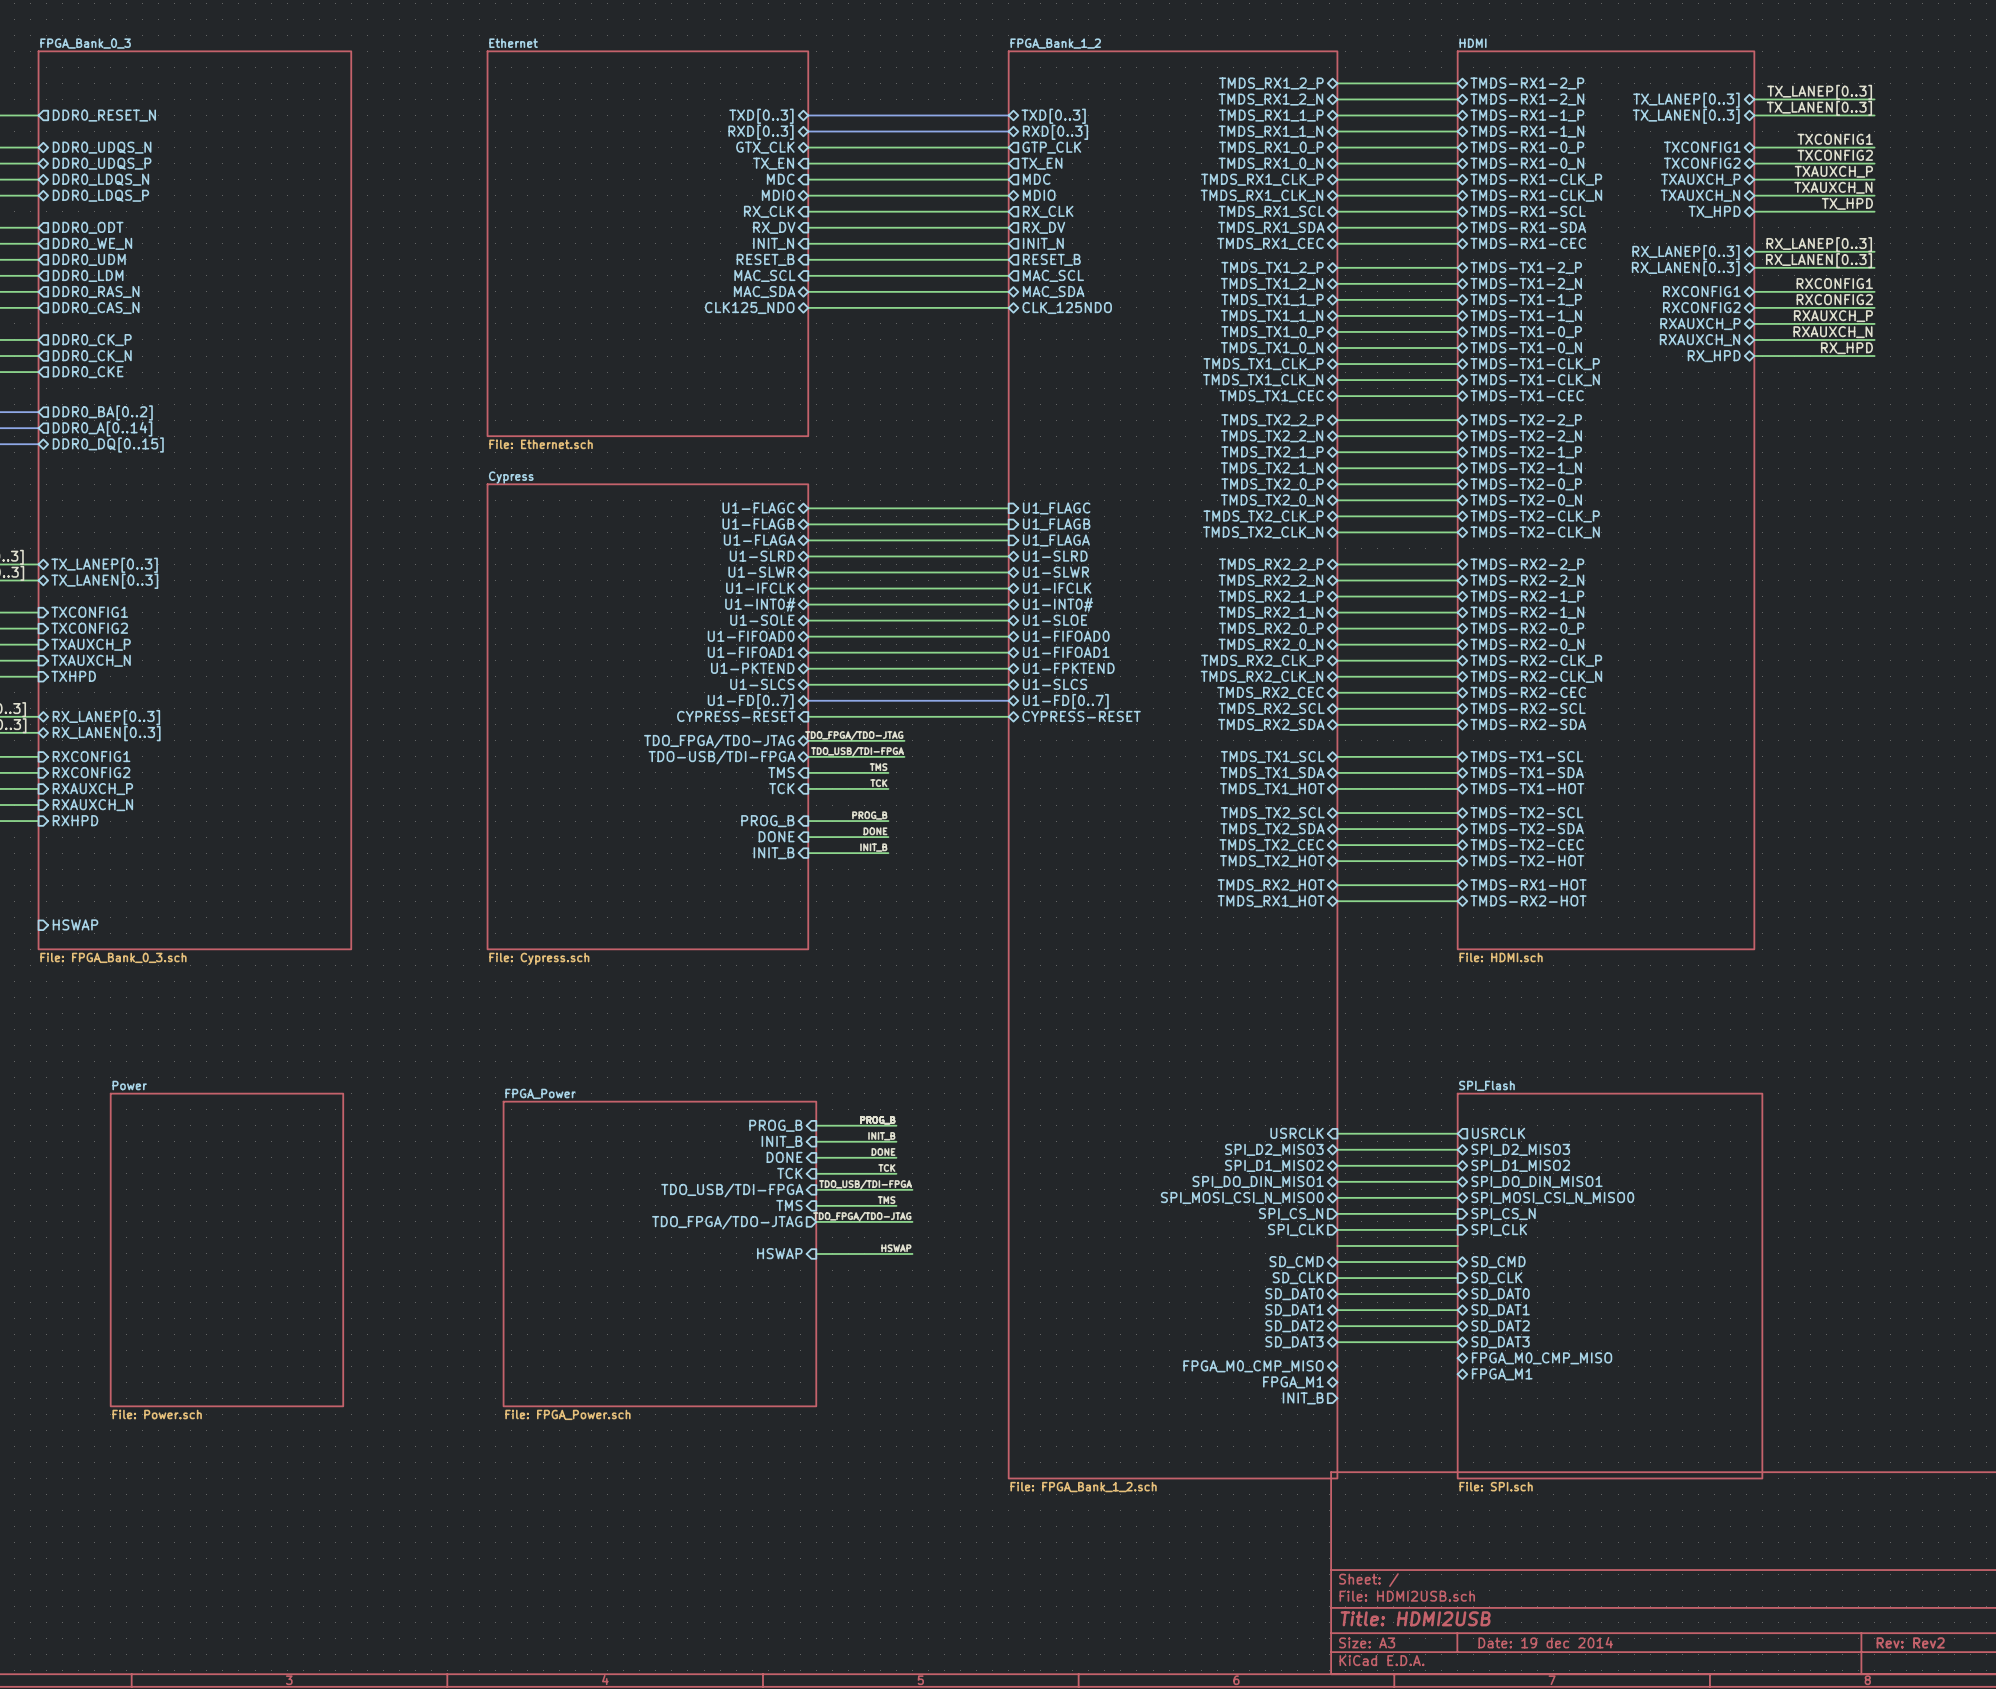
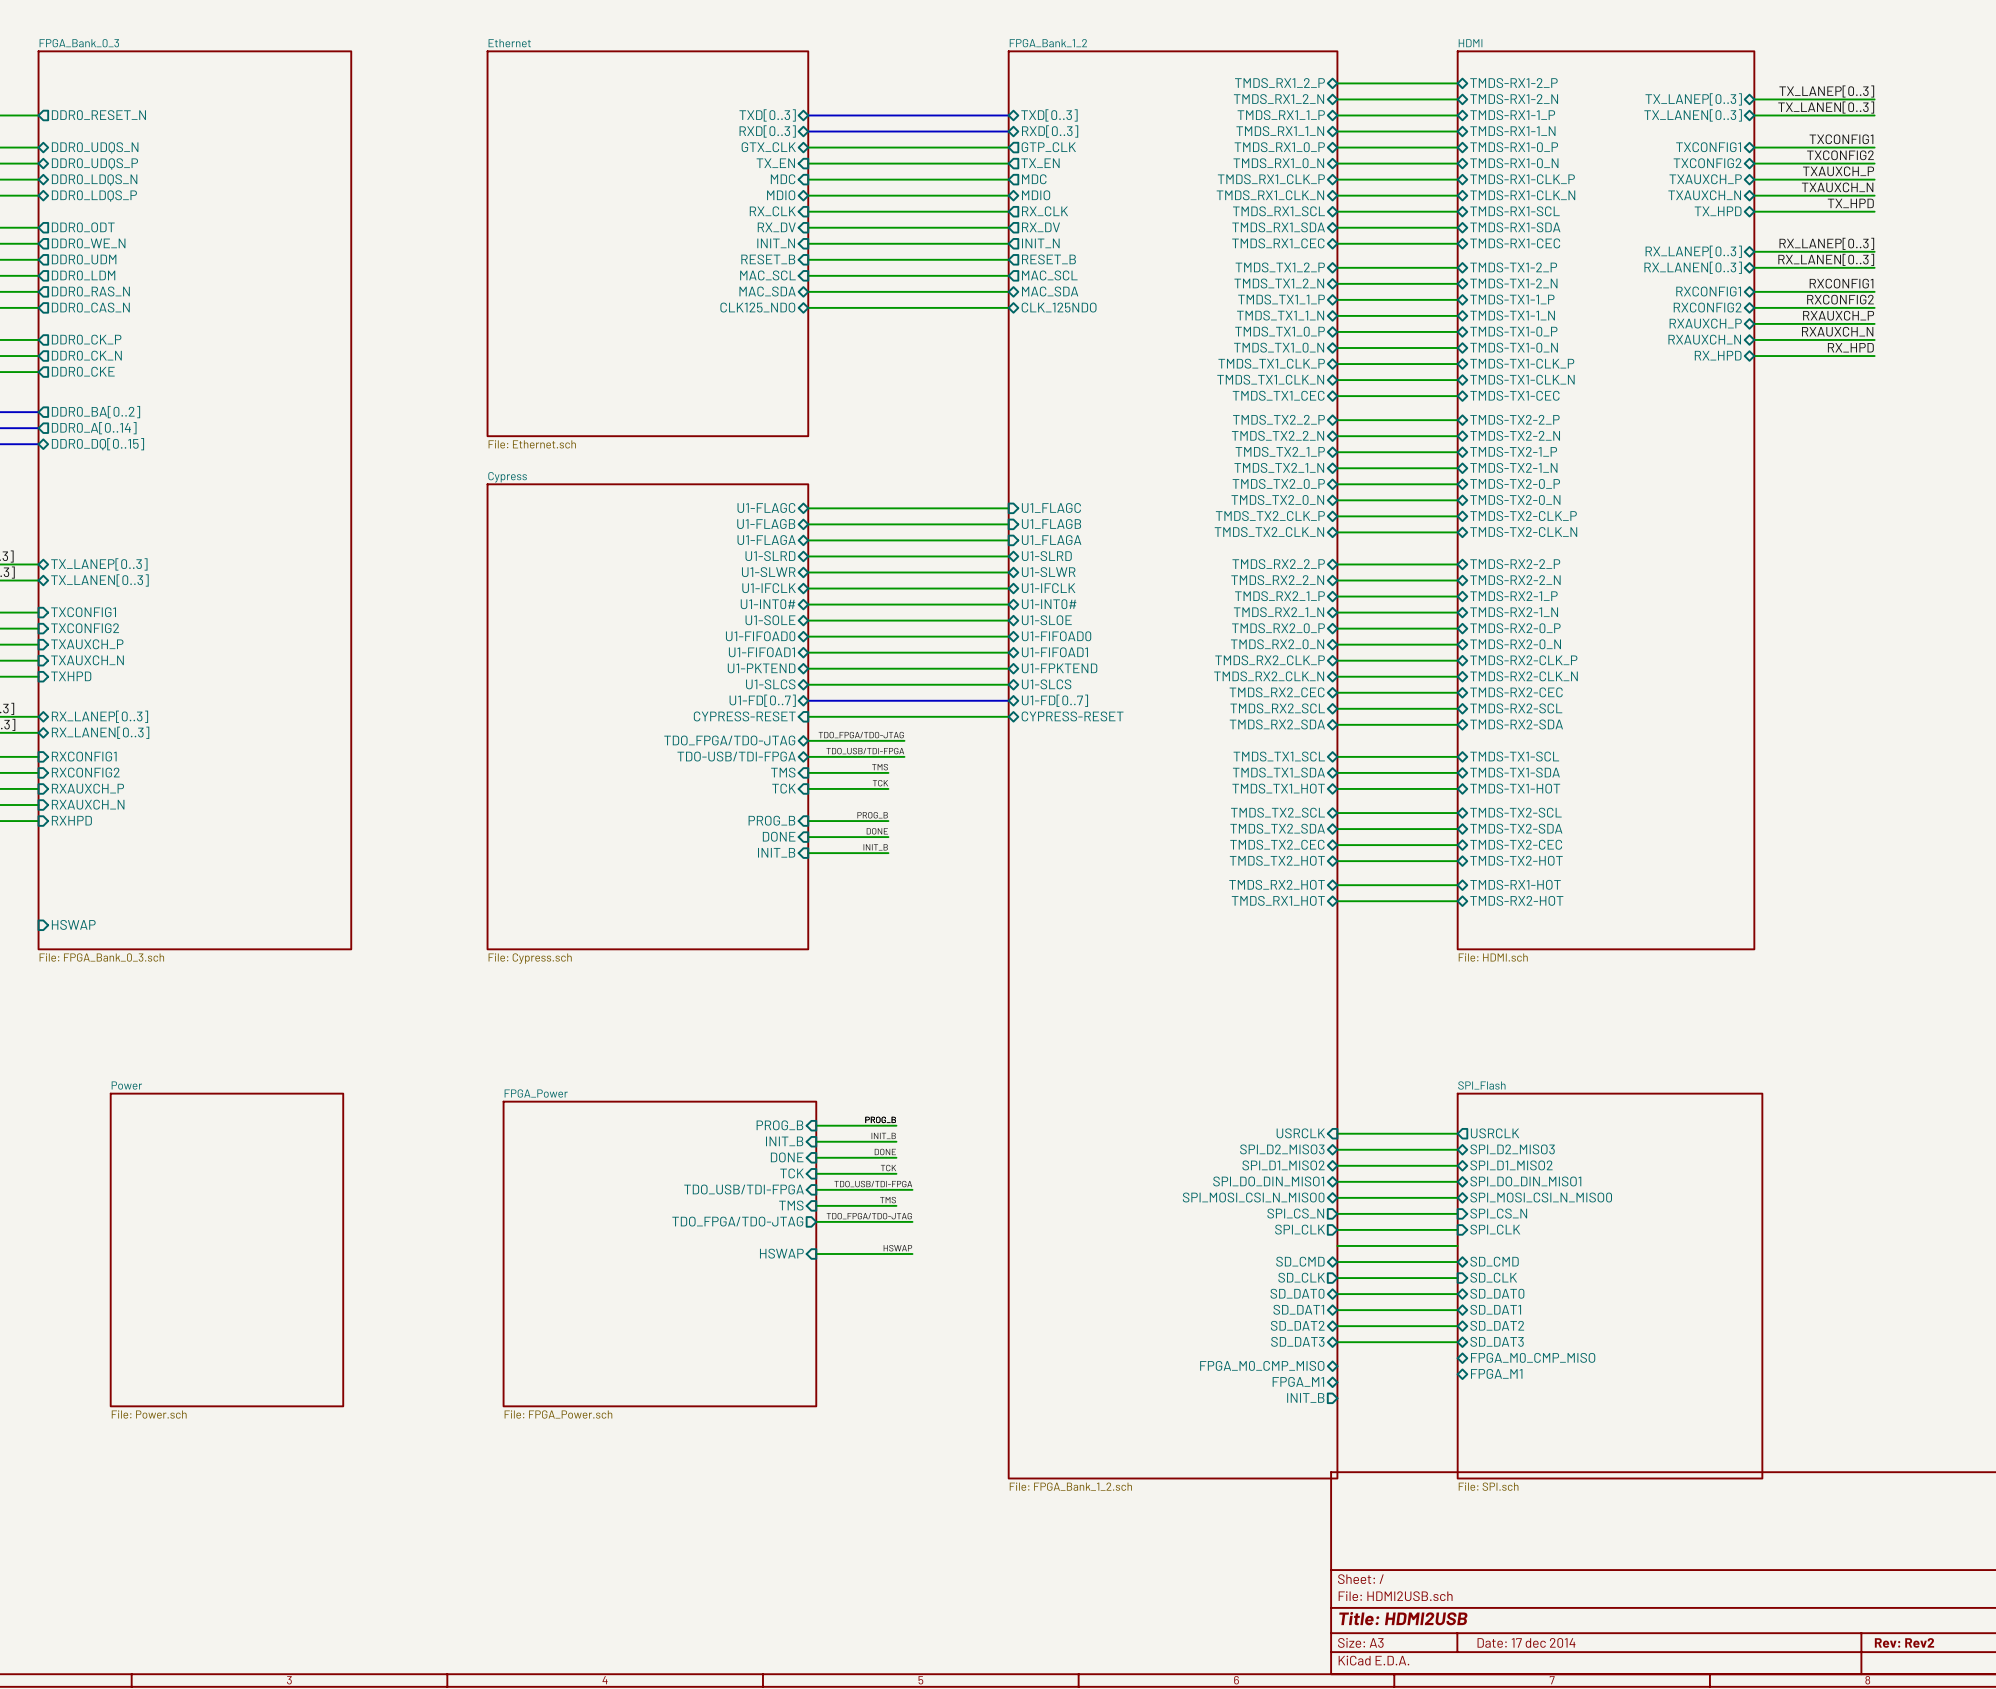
title block: Date: 19 dec 2014 (1545, 1642) -> Date: 17 dec 2014 (1526, 1642)

